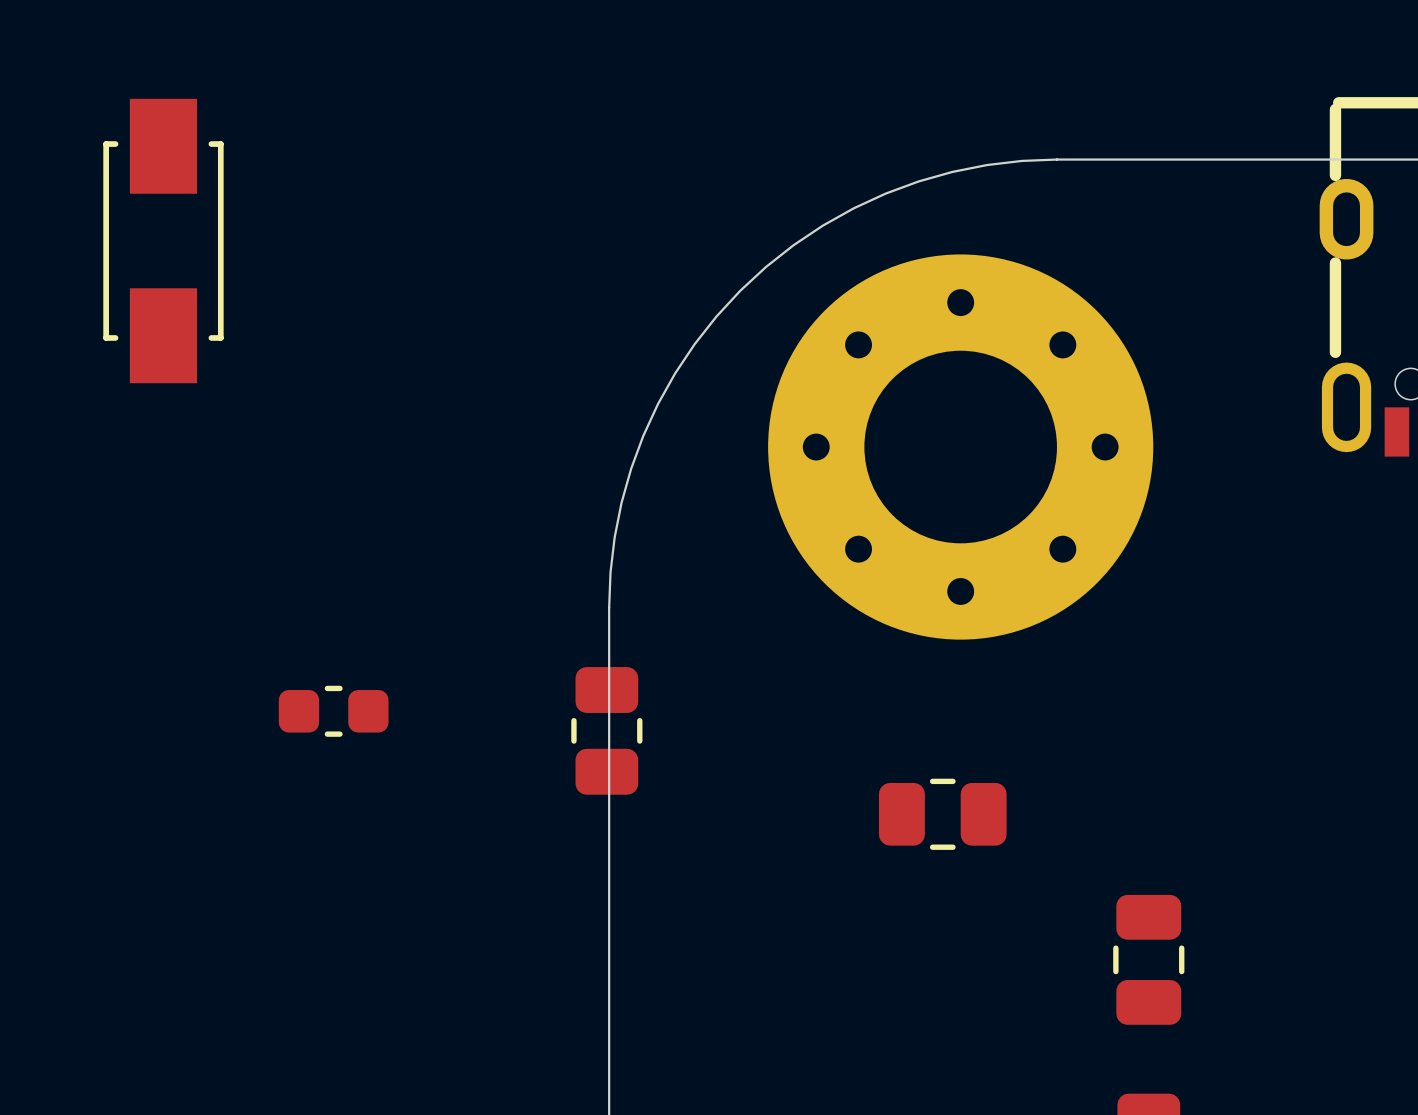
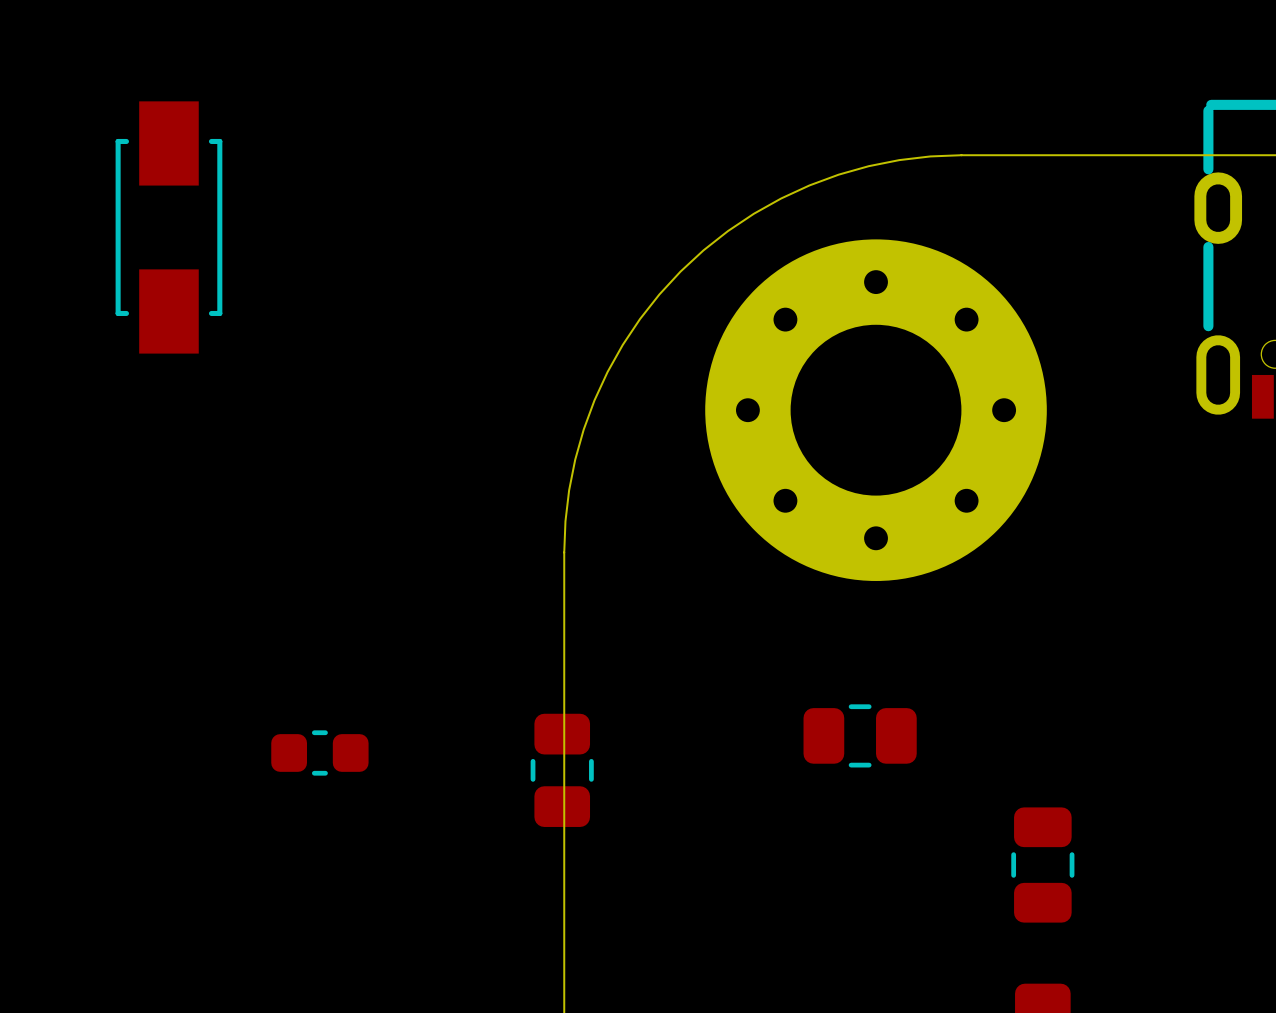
part position: (333, 711) -> (319, 752)
part position: (606, 730) -> (562, 770)

